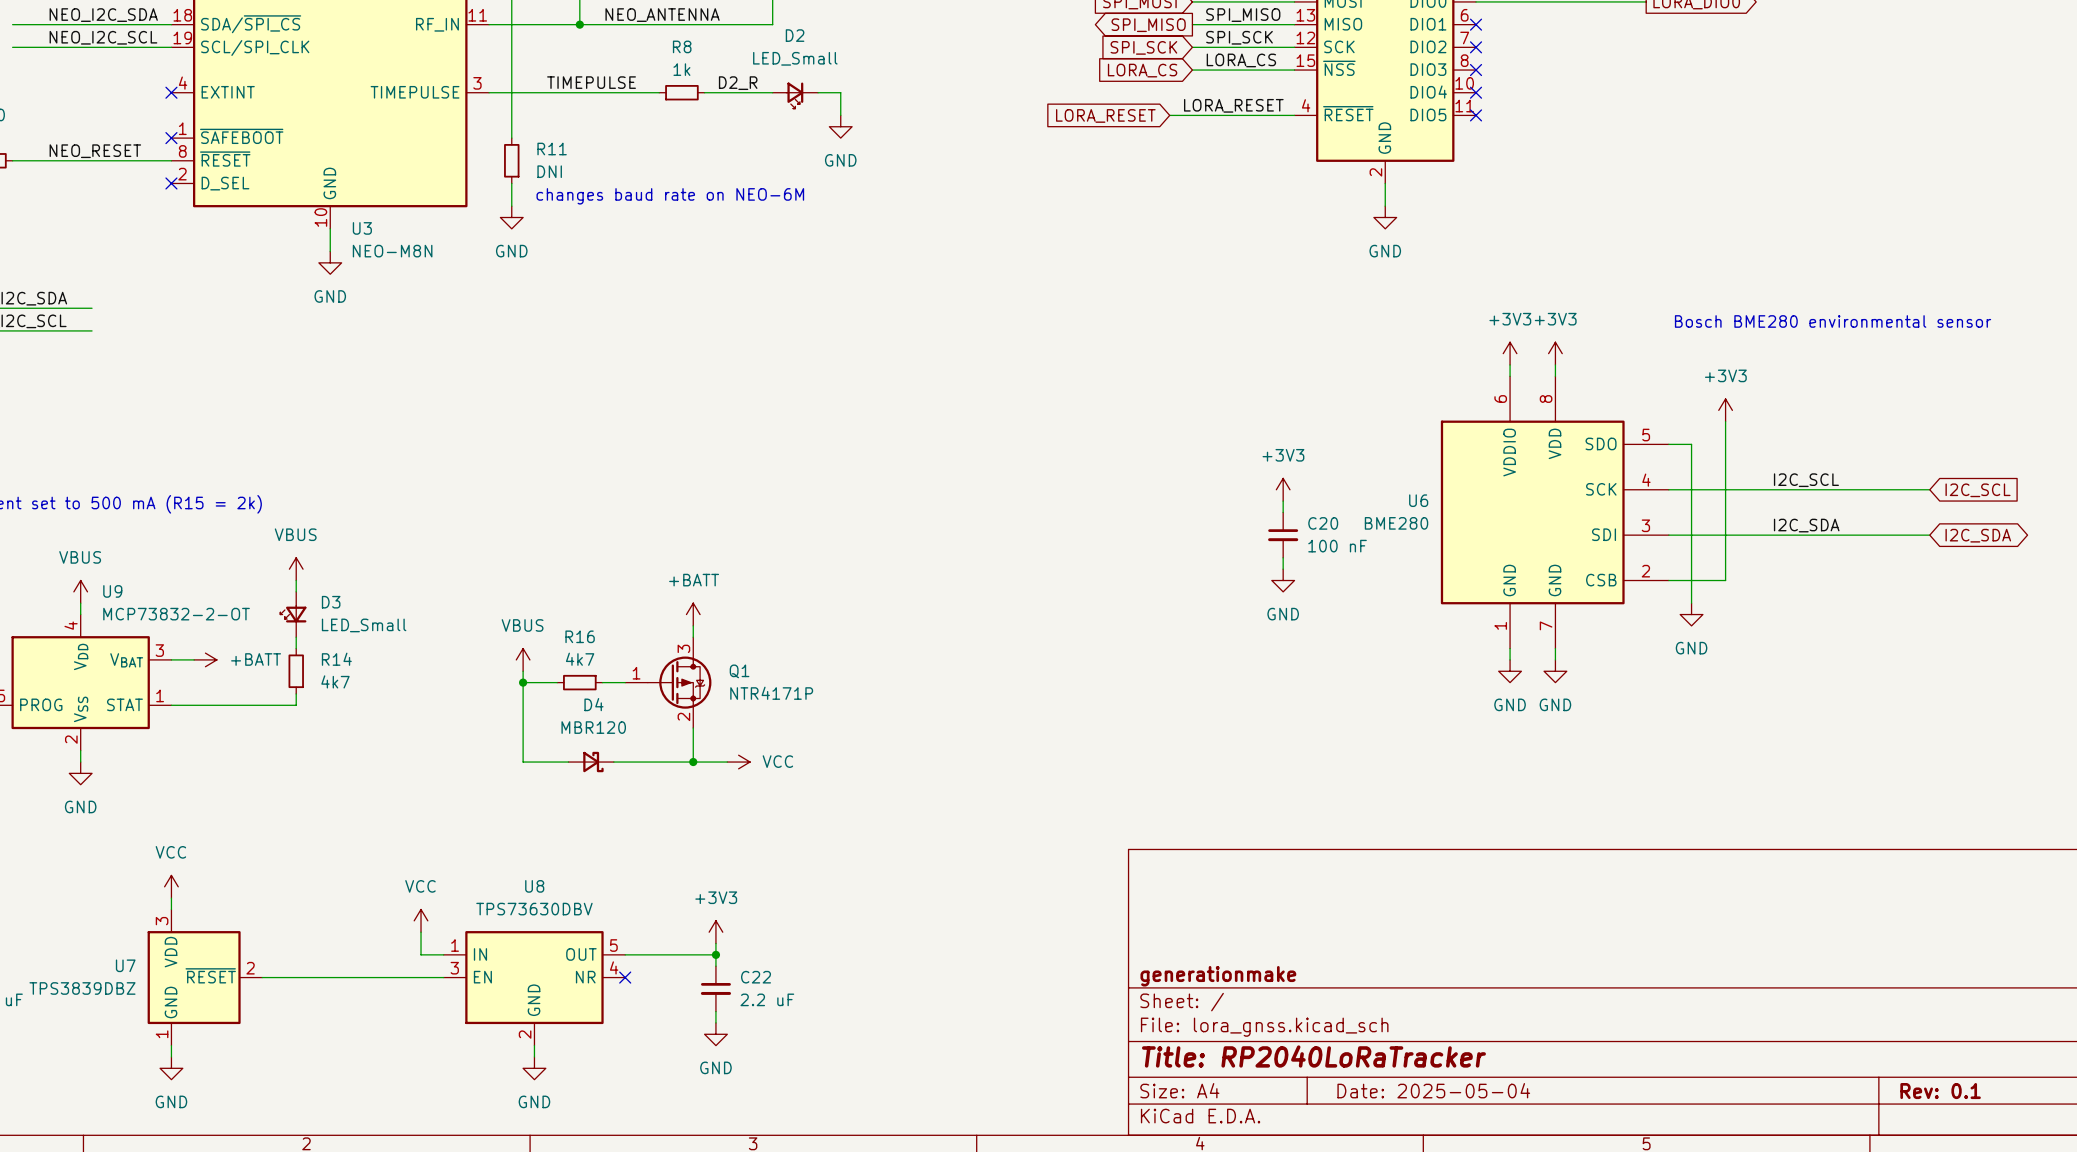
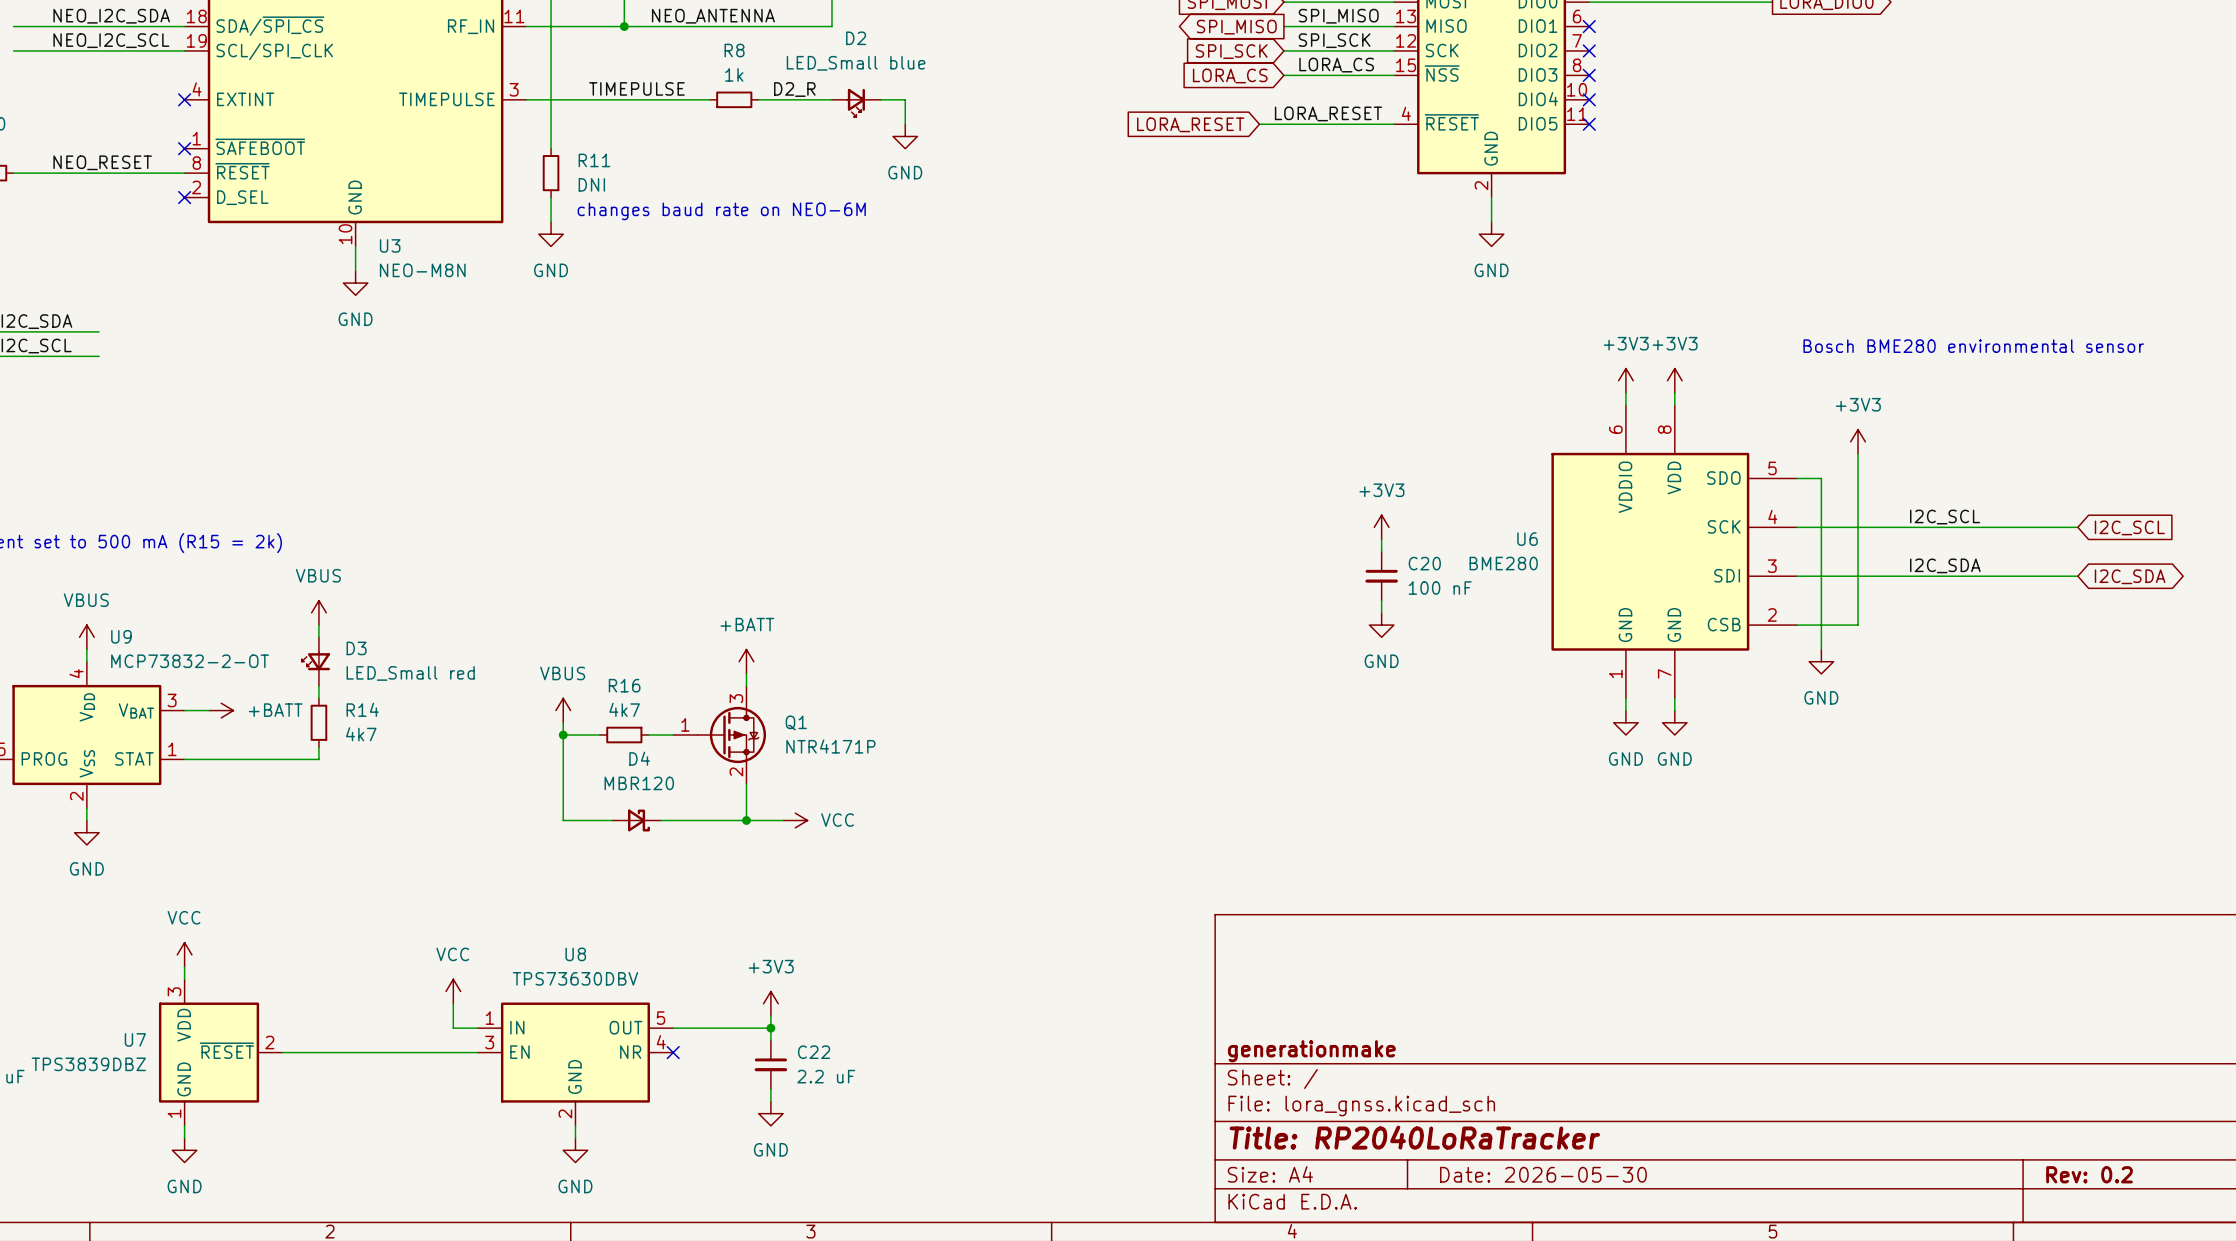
D2 value: LED_Small (795, 58) -> LED_Small blue (856, 63)
D3 value: LED_Small (364, 625) -> LED_Small red (410, 673)
title block: Date: 2025-05-04 (1433, 1090) -> Date: 2026-05-30 (1543, 1174)
title block: Rev: 0.1 (1940, 1091) -> Rev: 0.2 (2089, 1174)

